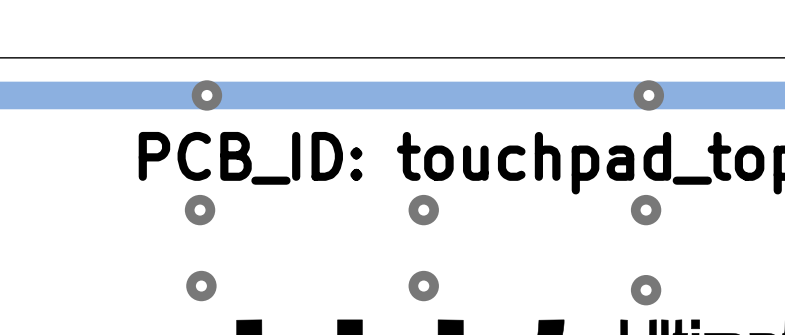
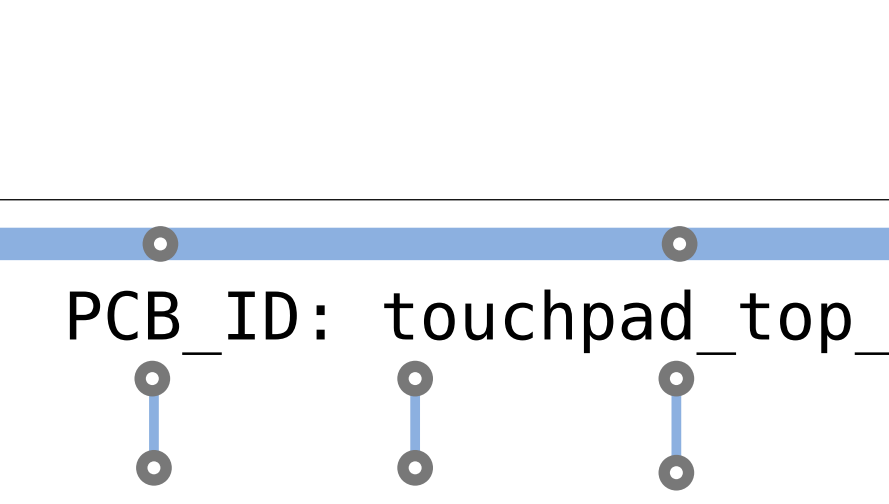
track: none -> (152, 378) (153, 380) (153, 467)
track: none -> (415, 378) (415, 467)
track: none -> (676, 378) (676, 472)

